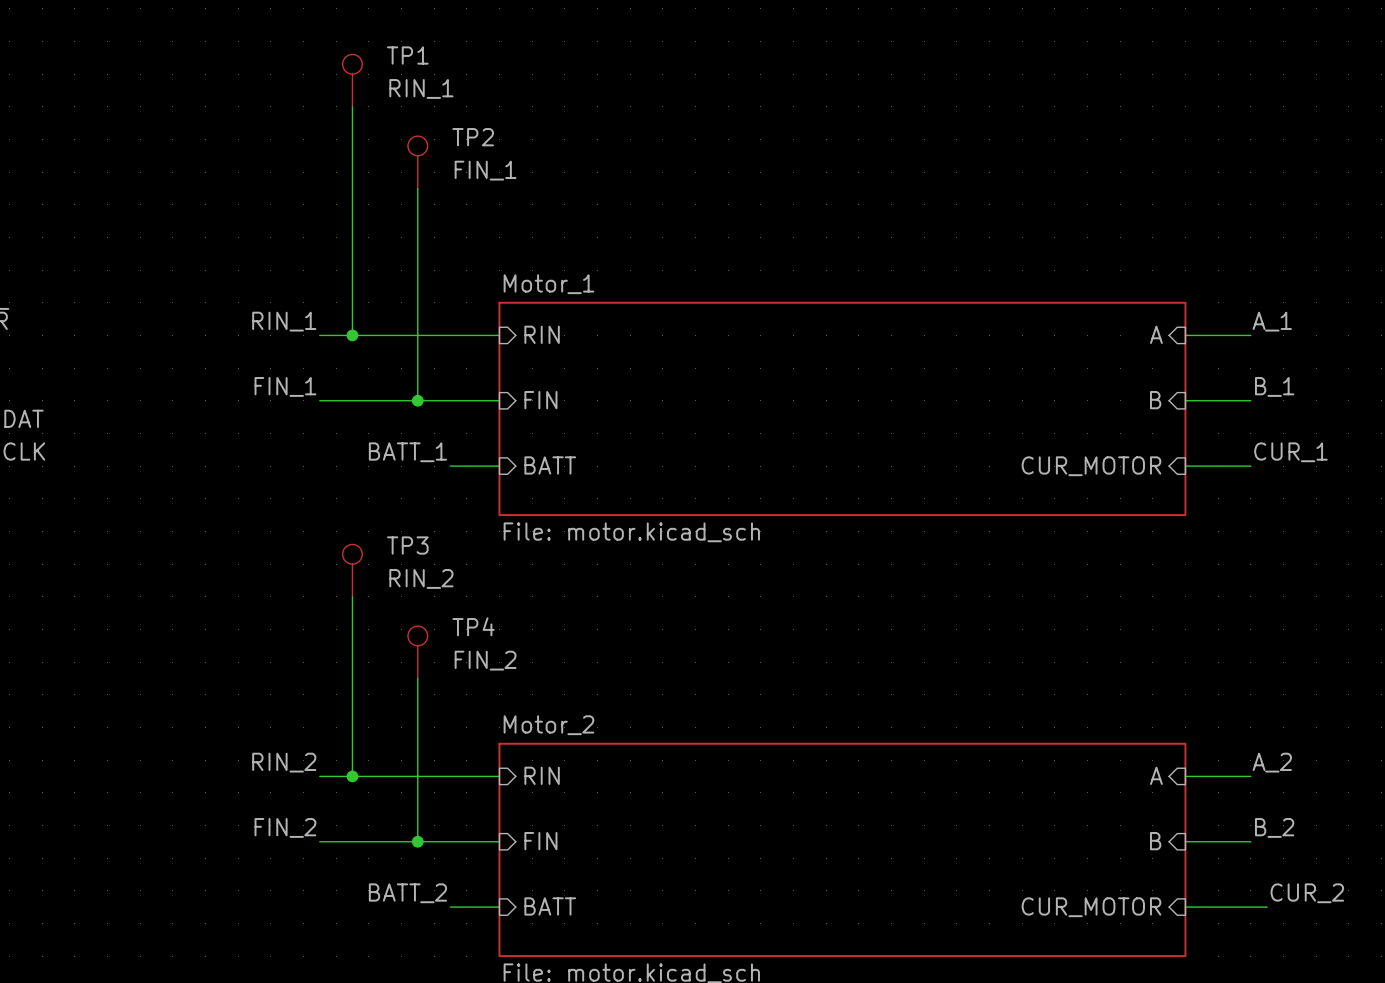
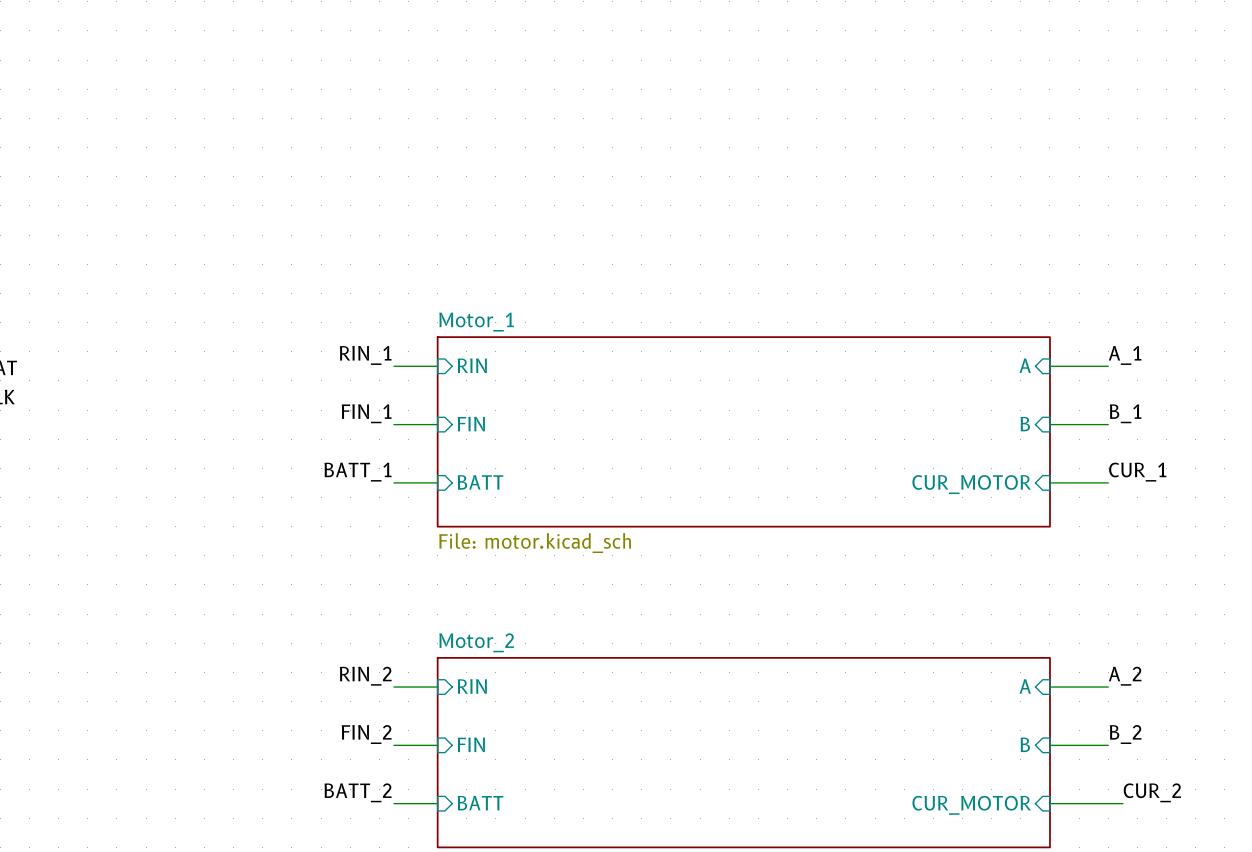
TP1: RIN_1 (352, 80) -> none
wire: (352, 106) (352, 335) -> none
TP2: FIN_1 (417, 162) -> none
wire: (417, 188) (417, 400) -> none
label position: RIN_1 (284, 321) -> RIN_1 (365, 355)
label position: A_1 (1272, 321) -> A_1 (1125, 355)
sheet pin position: RIN (542, 334) -> RIN (472, 365)
sheet pin position: A (1156, 334) -> A (1025, 365)
wire: (319, 335) (499, 335) -> none
junction: (352, 335) -> none
wire: (1185, 335) (1250, 335) -> (1049, 366) (1108, 366)
label position: FIN_1 (285, 386) -> FIN_1 (366, 413)
label position: B_1 (1274, 386) -> B_1 (1125, 413)
wire: (319, 400) (499, 400) -> none
junction: (417, 400) -> none
sheet pin position: FIN (540, 400) -> FIN (471, 424)
sheet pin position: B (1155, 400) -> B (1025, 424)
wire: (1185, 400) (1250, 400) -> (1049, 424) (1108, 424)
sheet Motor_1 position: (842, 408) -> (743, 431)
wire: none -> (393, 366) (437, 366)
label position: BATT_1 (407, 452) -> BATT_1 (358, 472)
label position: CUR_1 (1290, 452) -> CUR_1 (1137, 472)
sheet pin position: BATT (550, 465) -> BATT (480, 482)
wire: (450, 466) (499, 466) -> (393, 482) (437, 482)
sheet pin position: CUR_MOTOR (1091, 466) -> CUR_MOTOR (971, 484)
wire: (1185, 466) (1250, 466) -> (1049, 482) (1108, 482)
wire: none -> (393, 424) (437, 424)
TP3: RIN_2 (352, 570) -> none
wire: (352, 596) (352, 776) -> none
TP4: FIN_2 (417, 652) -> none
wire: (417, 678) (417, 841) -> none
label position: RIN_2 (284, 762) -> RIN_2 (365, 676)
wire: (319, 776) (450, 776) -> none
junction: (352, 776) -> none
label position: FIN_2 (285, 827) -> FIN_2 (366, 734)
wire: (319, 841) (450, 841) -> none
junction: (417, 841) -> none

